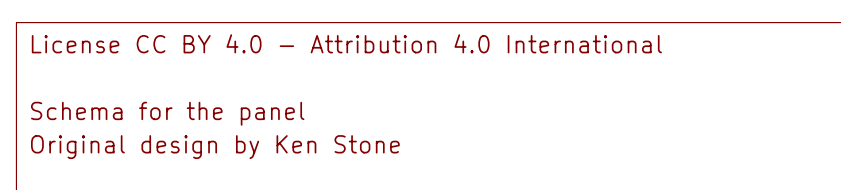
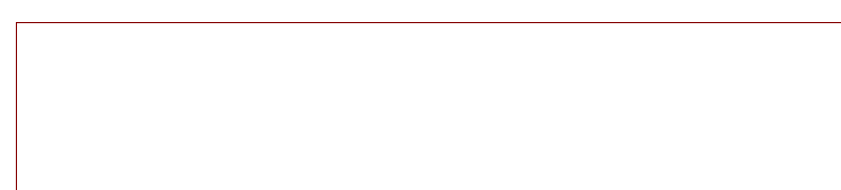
title block: License CC BY 4.0 - Attribution 4.0 International (346, 43) -> none
title block: Schema for the panel (167, 113) -> none
title block: Original design by Ken Stone (215, 147) -> none

